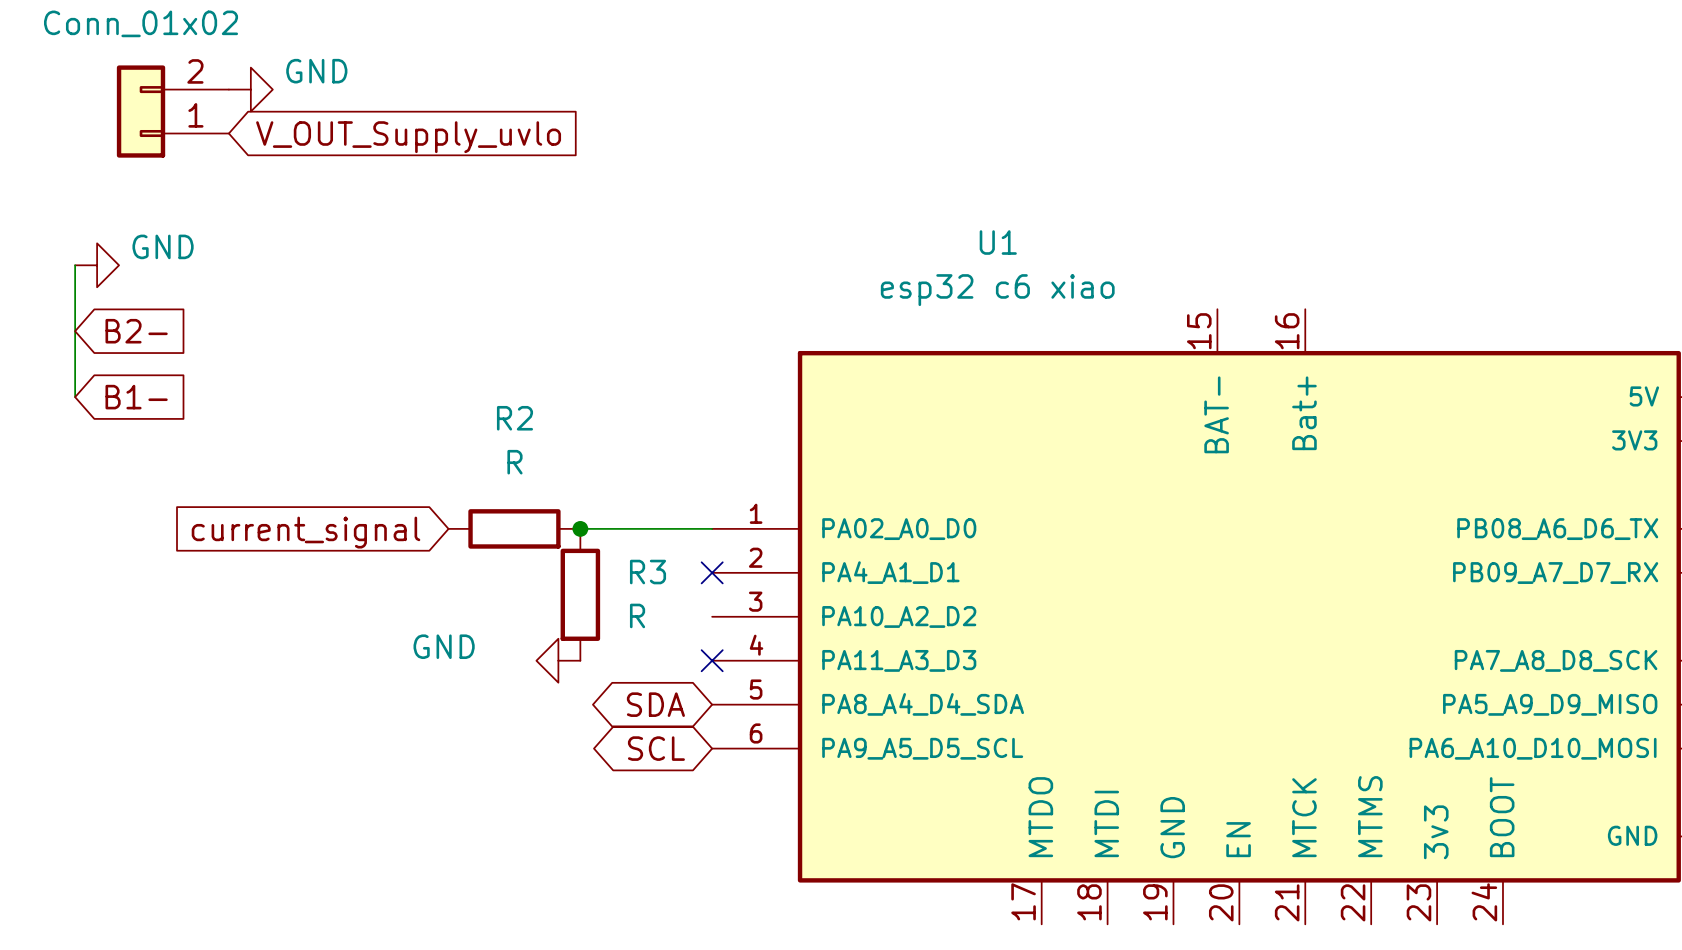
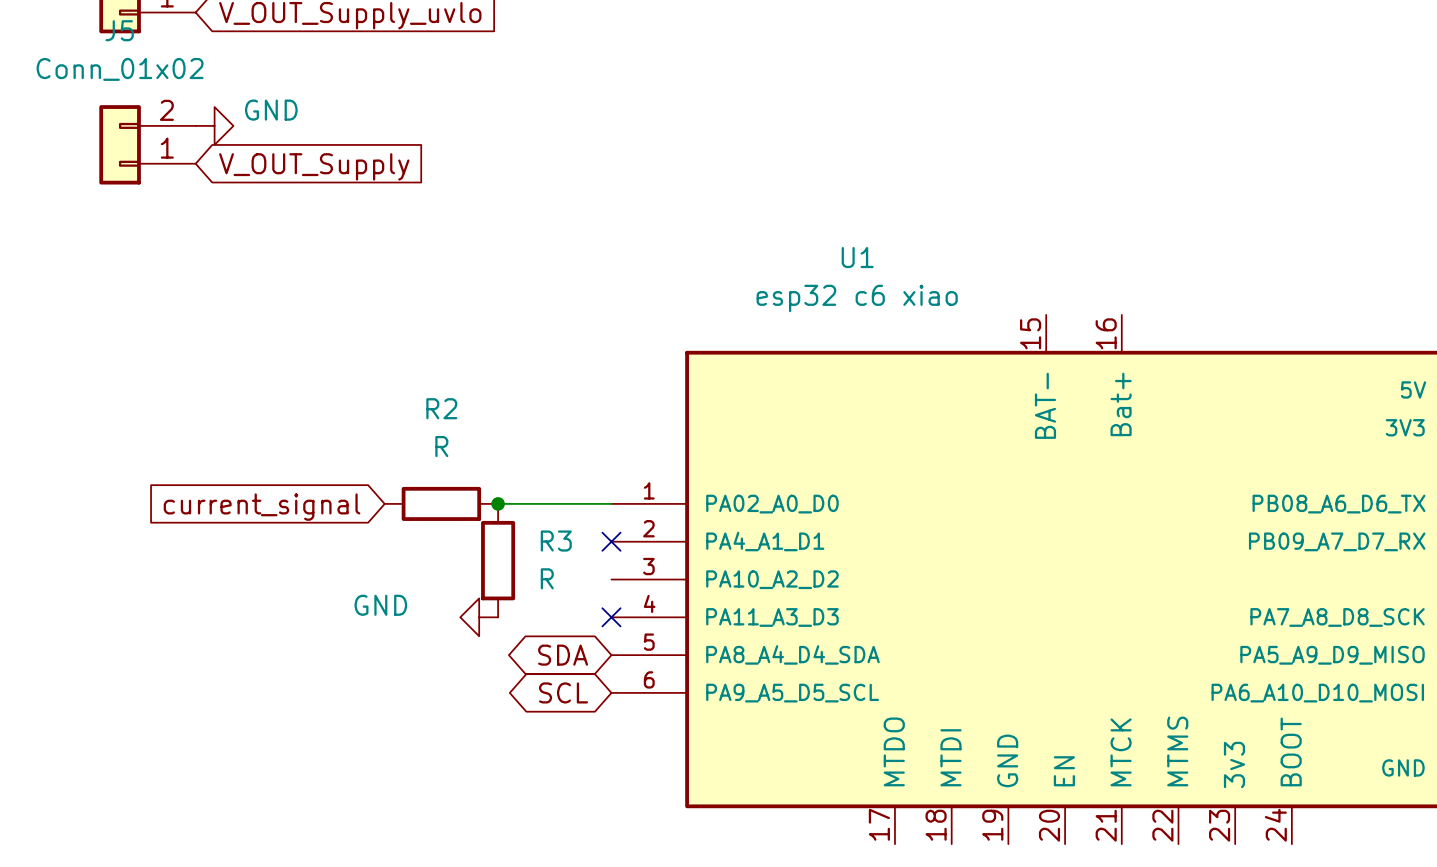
global label: V_OUT_Supply_uvlo (408, 137) -> V_OUT_Supply (314, 166)
wire: (75, 265) (75, 397) -> none
power symbol: GND (97, 265) -> none
global label: B2- (136, 331) -> none
global label: B1- (136, 397) -> none

